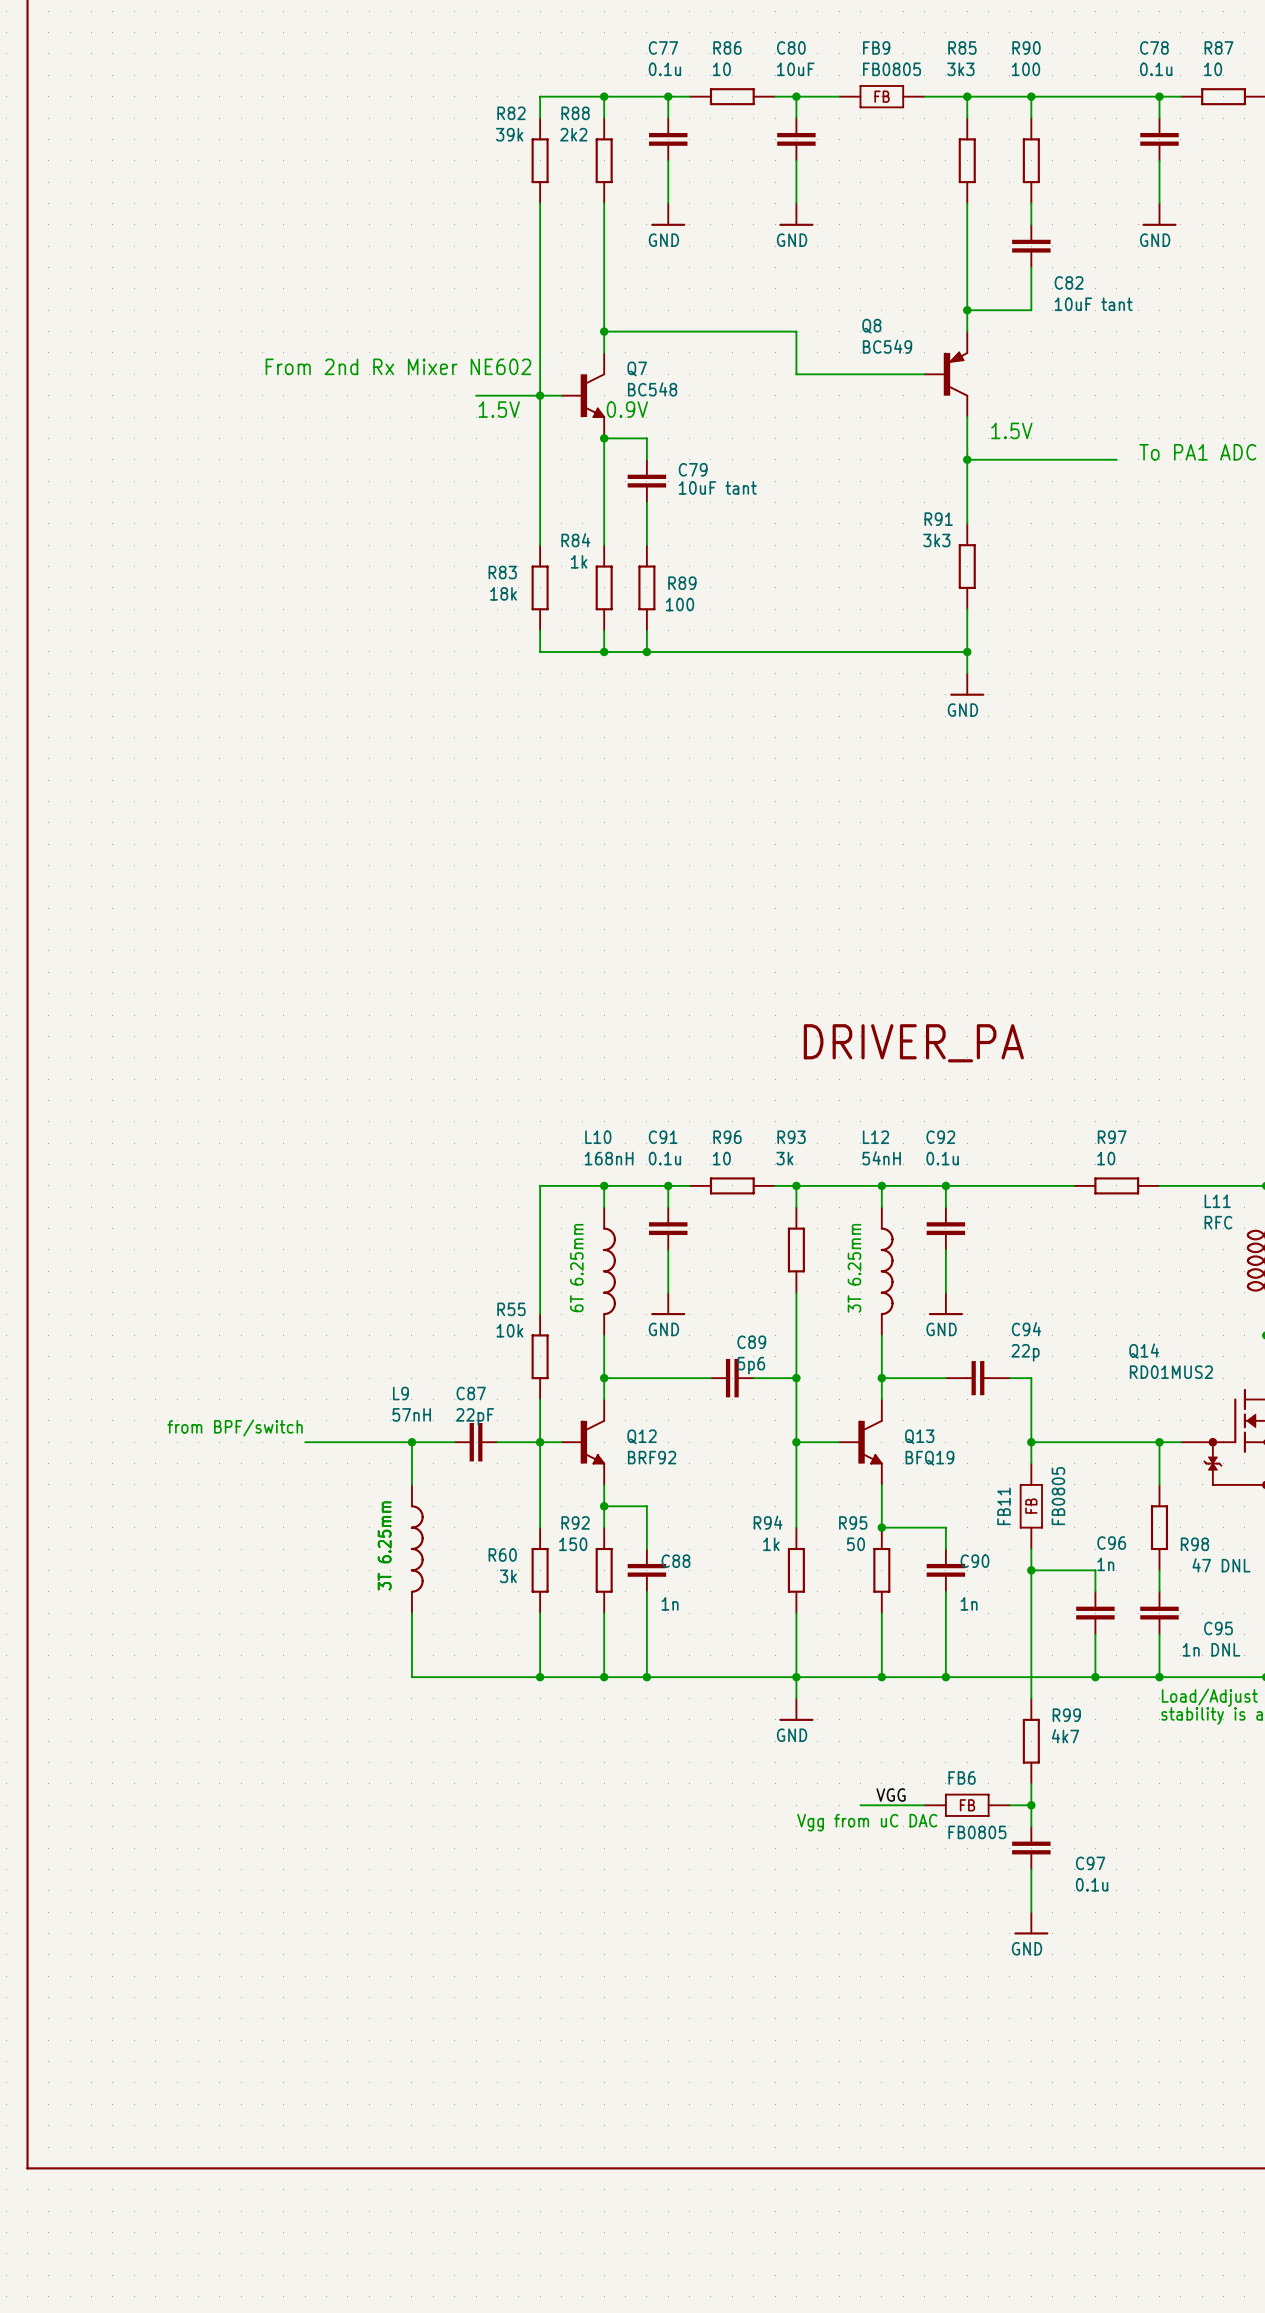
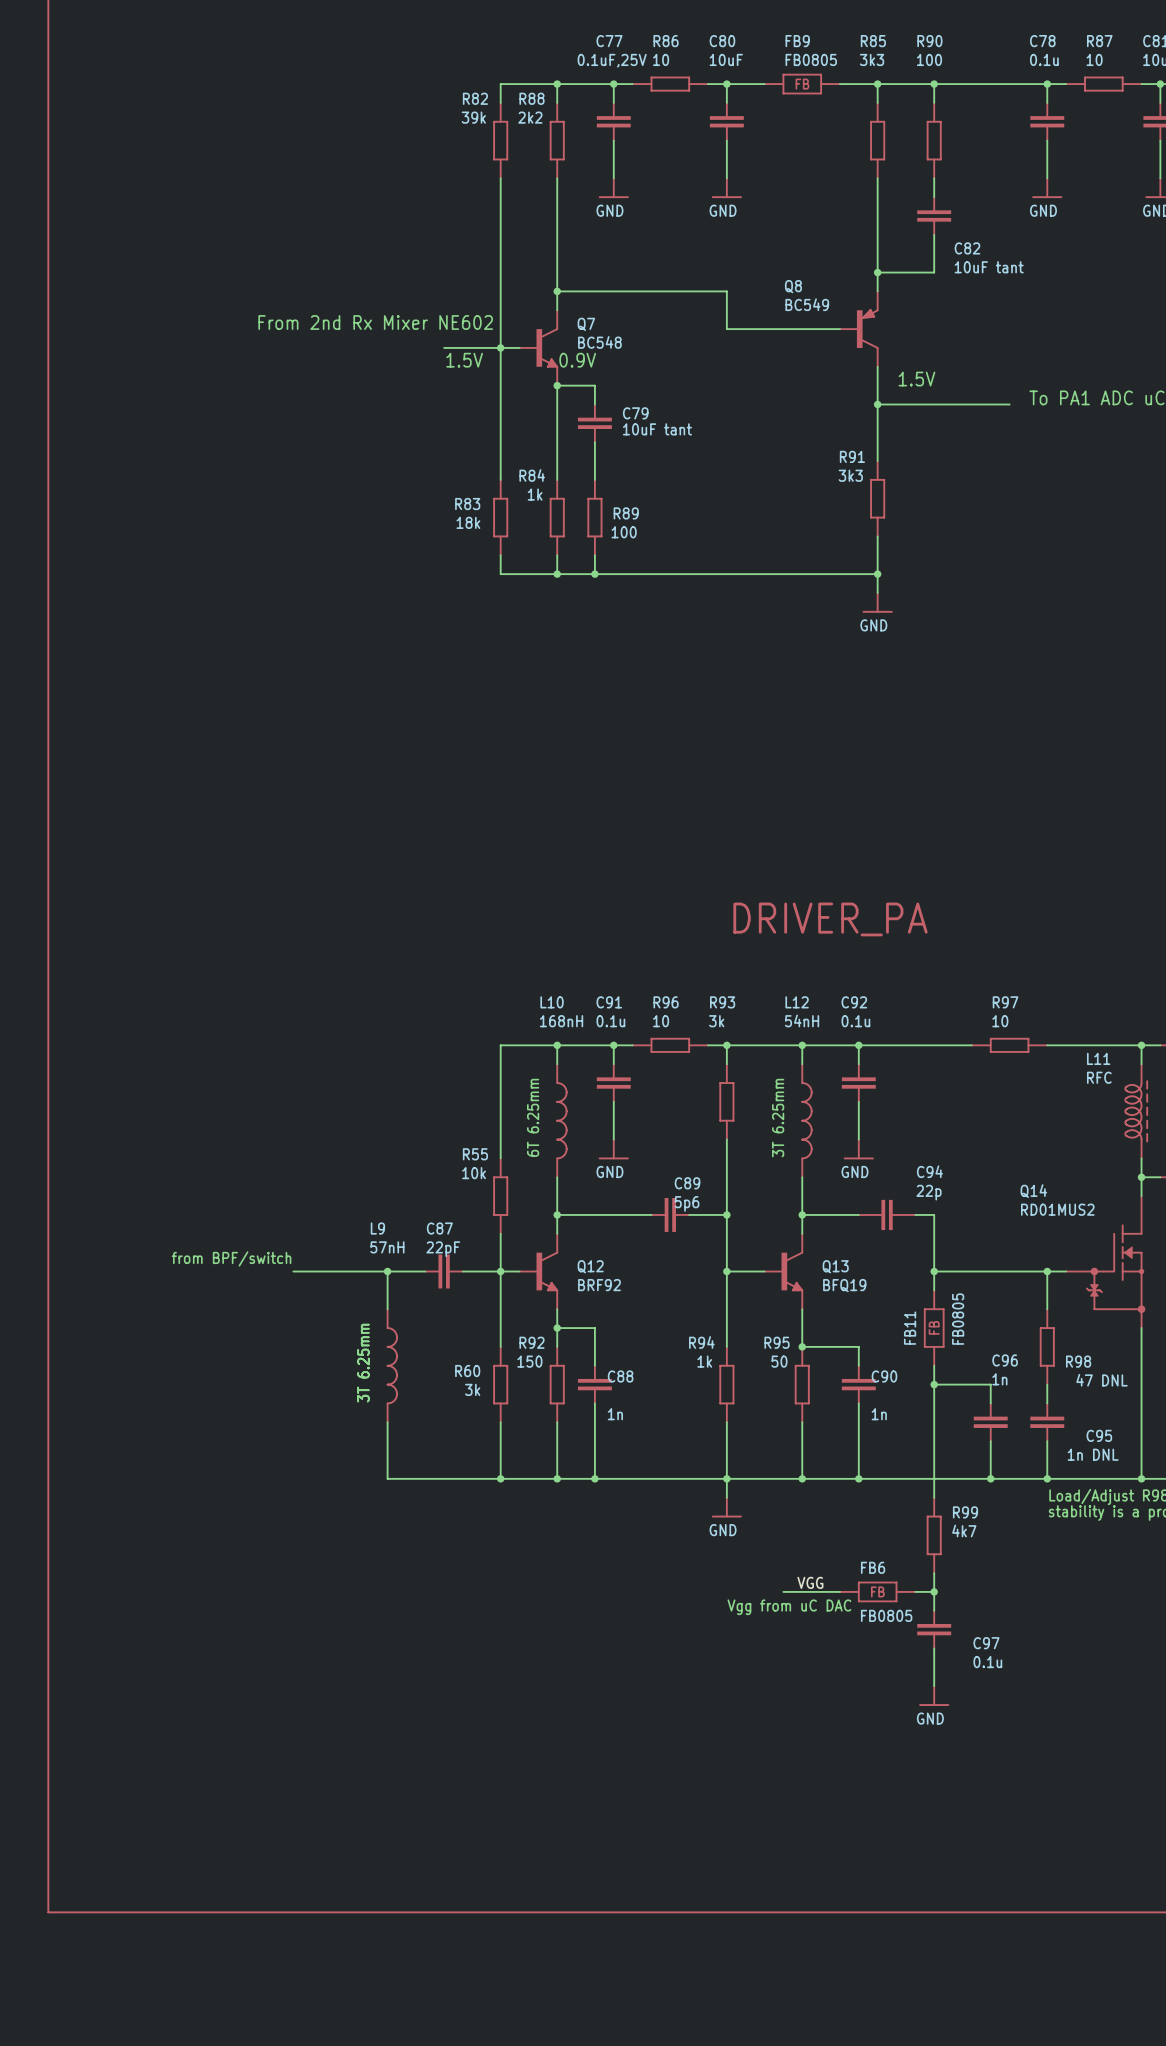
C77 value: 0.1u (664, 69) -> 0.1uF,25V (612, 60)

